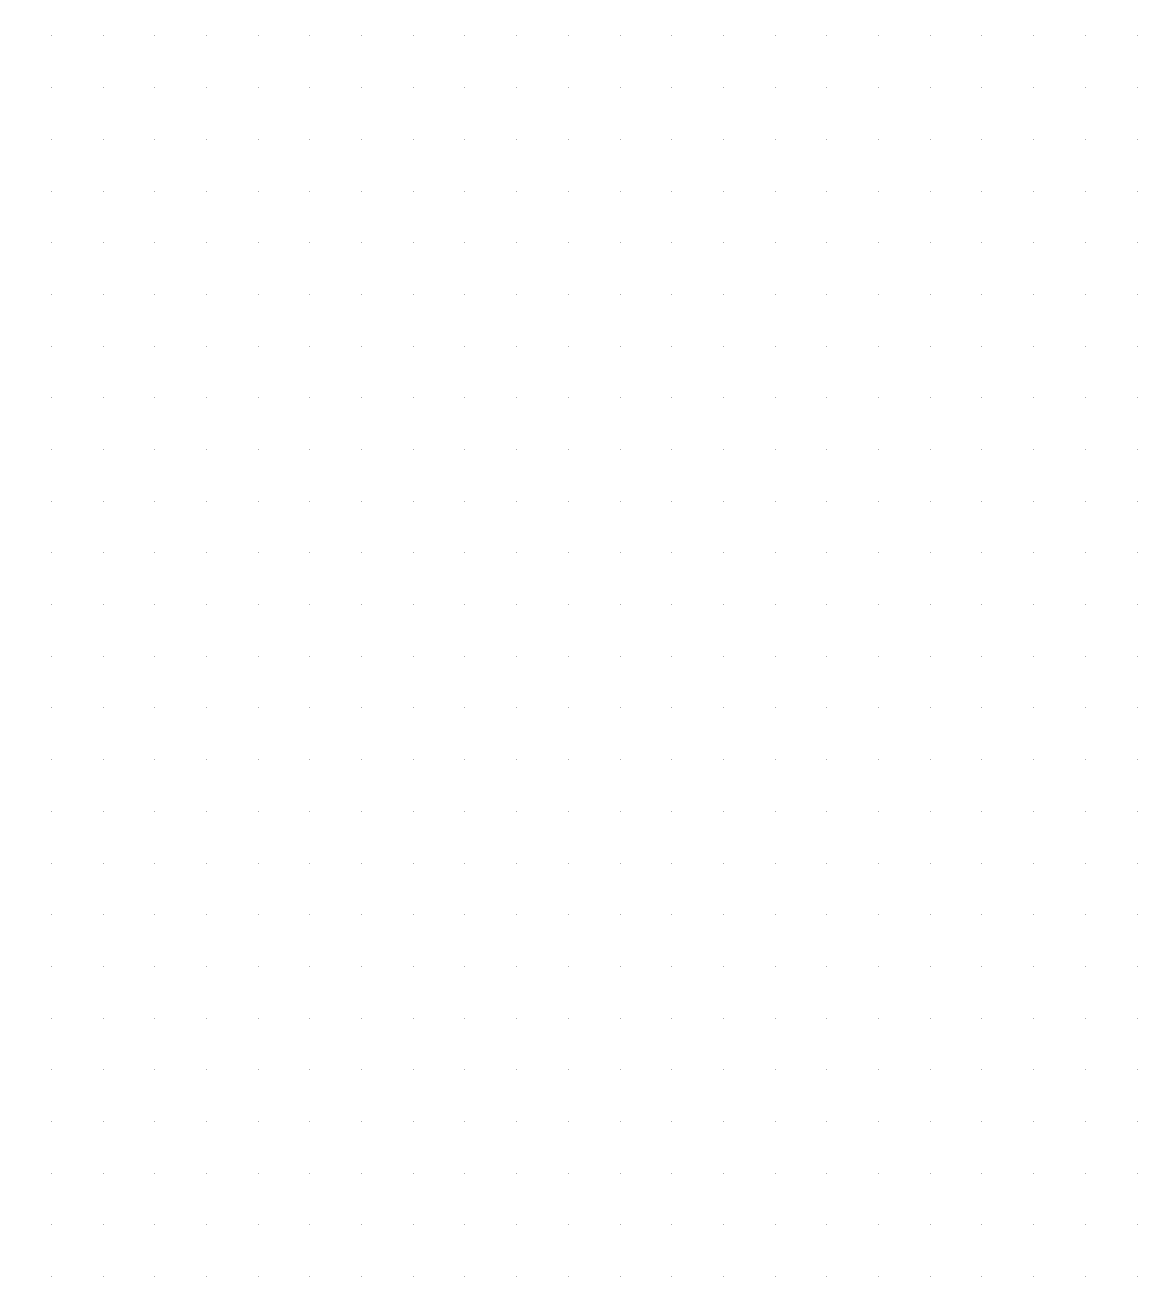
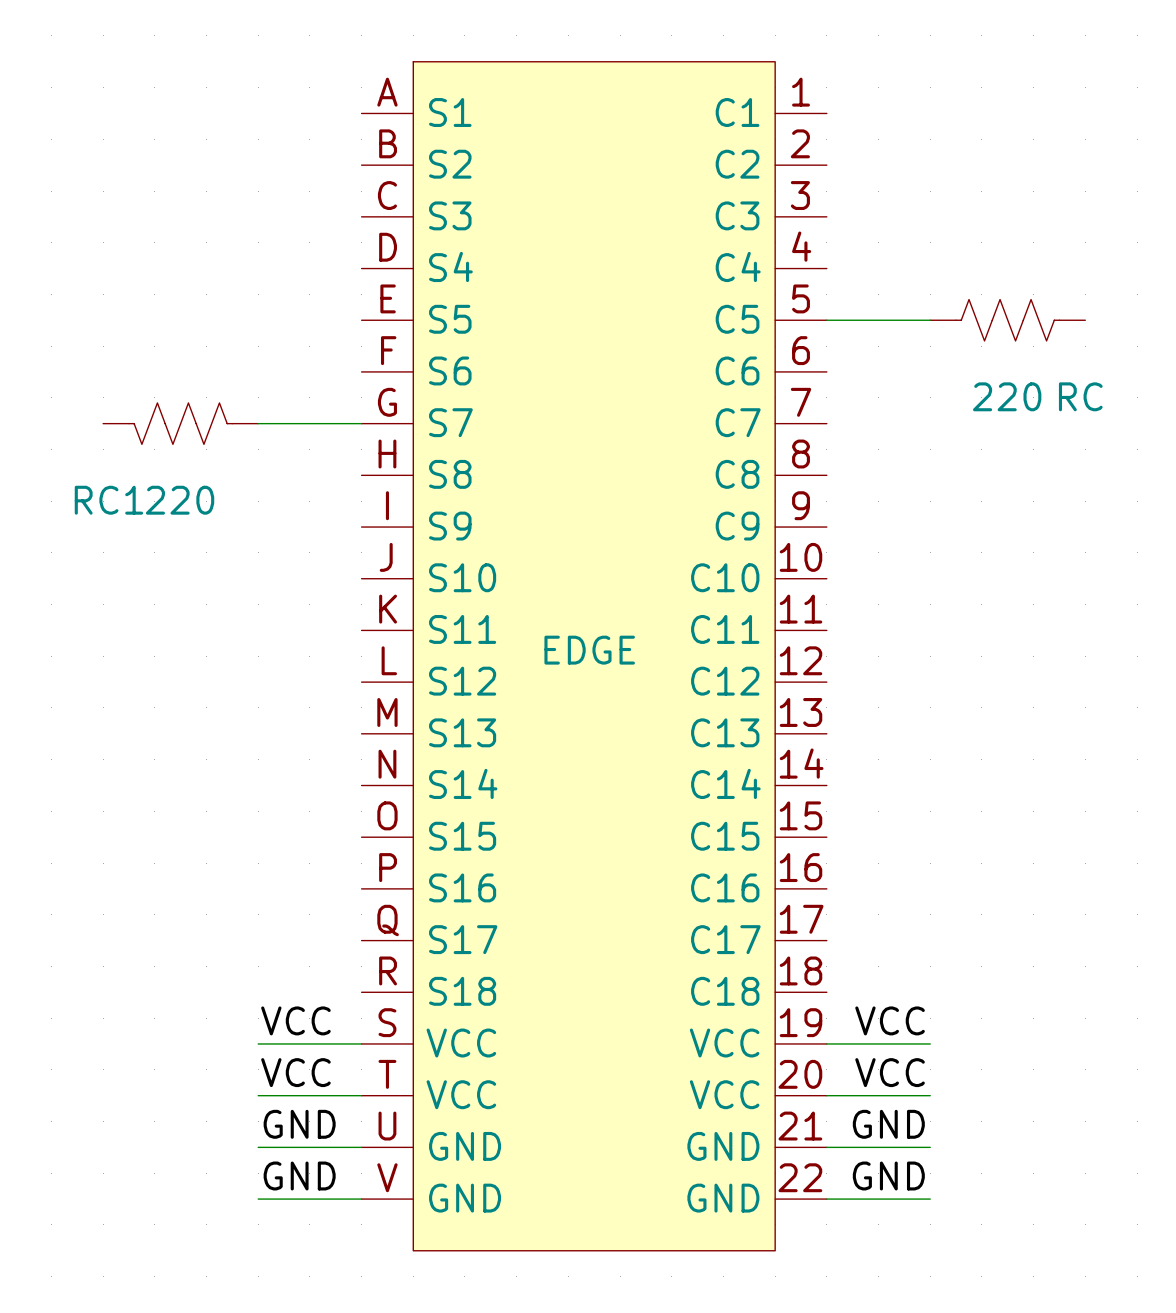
wire: none -> (826, 320) (930, 320)
RC: none -> 220 (1007, 320)
RC1: none -> 220 (180, 423)
wire: none -> (258, 423) (361, 423)
EDGE: none -> (594, 656)
label: none -> VCC (295, 1020)
label: none -> VCC (890, 1020)
wire: none -> (258, 1043) (361, 1043)
wire: none -> (826, 1043) (930, 1043)
label: none -> VCC (295, 1072)
label: none -> VCC (890, 1072)
wire: none -> (258, 1095) (361, 1095)
wire: none -> (826, 1095) (930, 1095)
label: none -> GND (299, 1124)
label: none -> GND (888, 1124)
wire: none -> (258, 1147) (361, 1147)
wire: none -> (826, 1147) (930, 1147)
label: none -> GND (299, 1176)
label: none -> GND (888, 1176)
wire: none -> (258, 1199) (361, 1199)
wire: none -> (826, 1199) (930, 1199)

